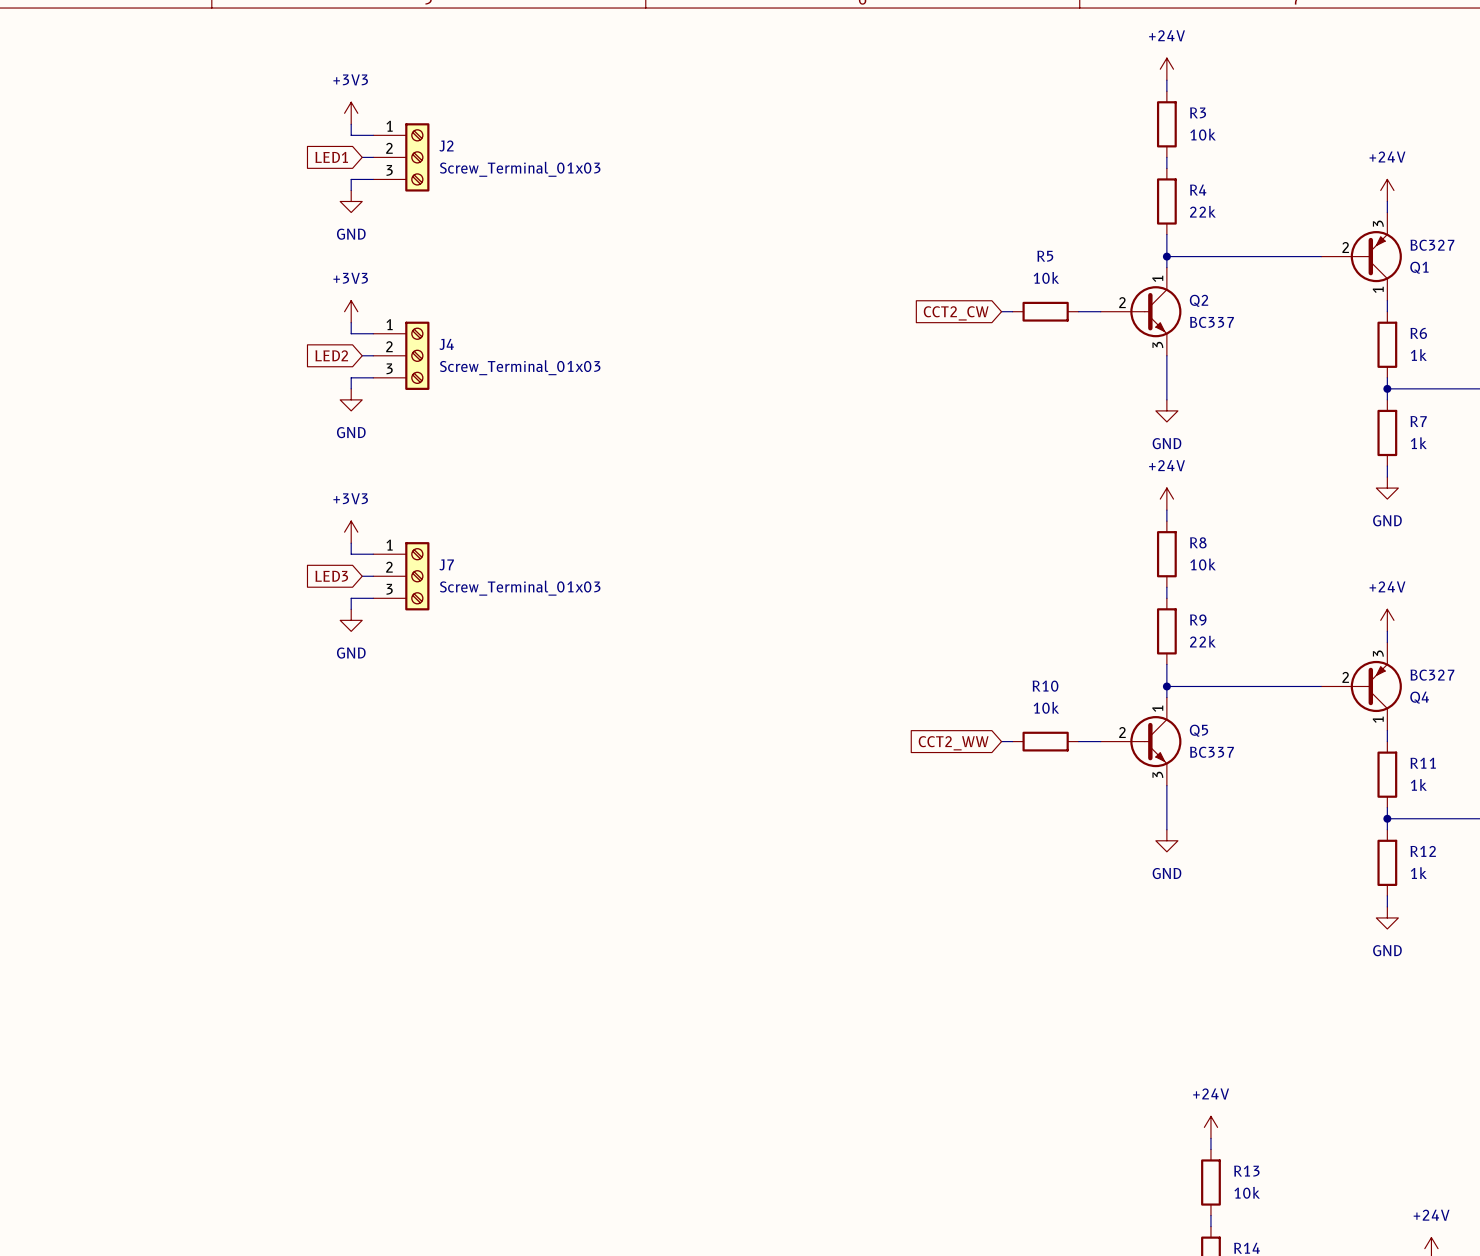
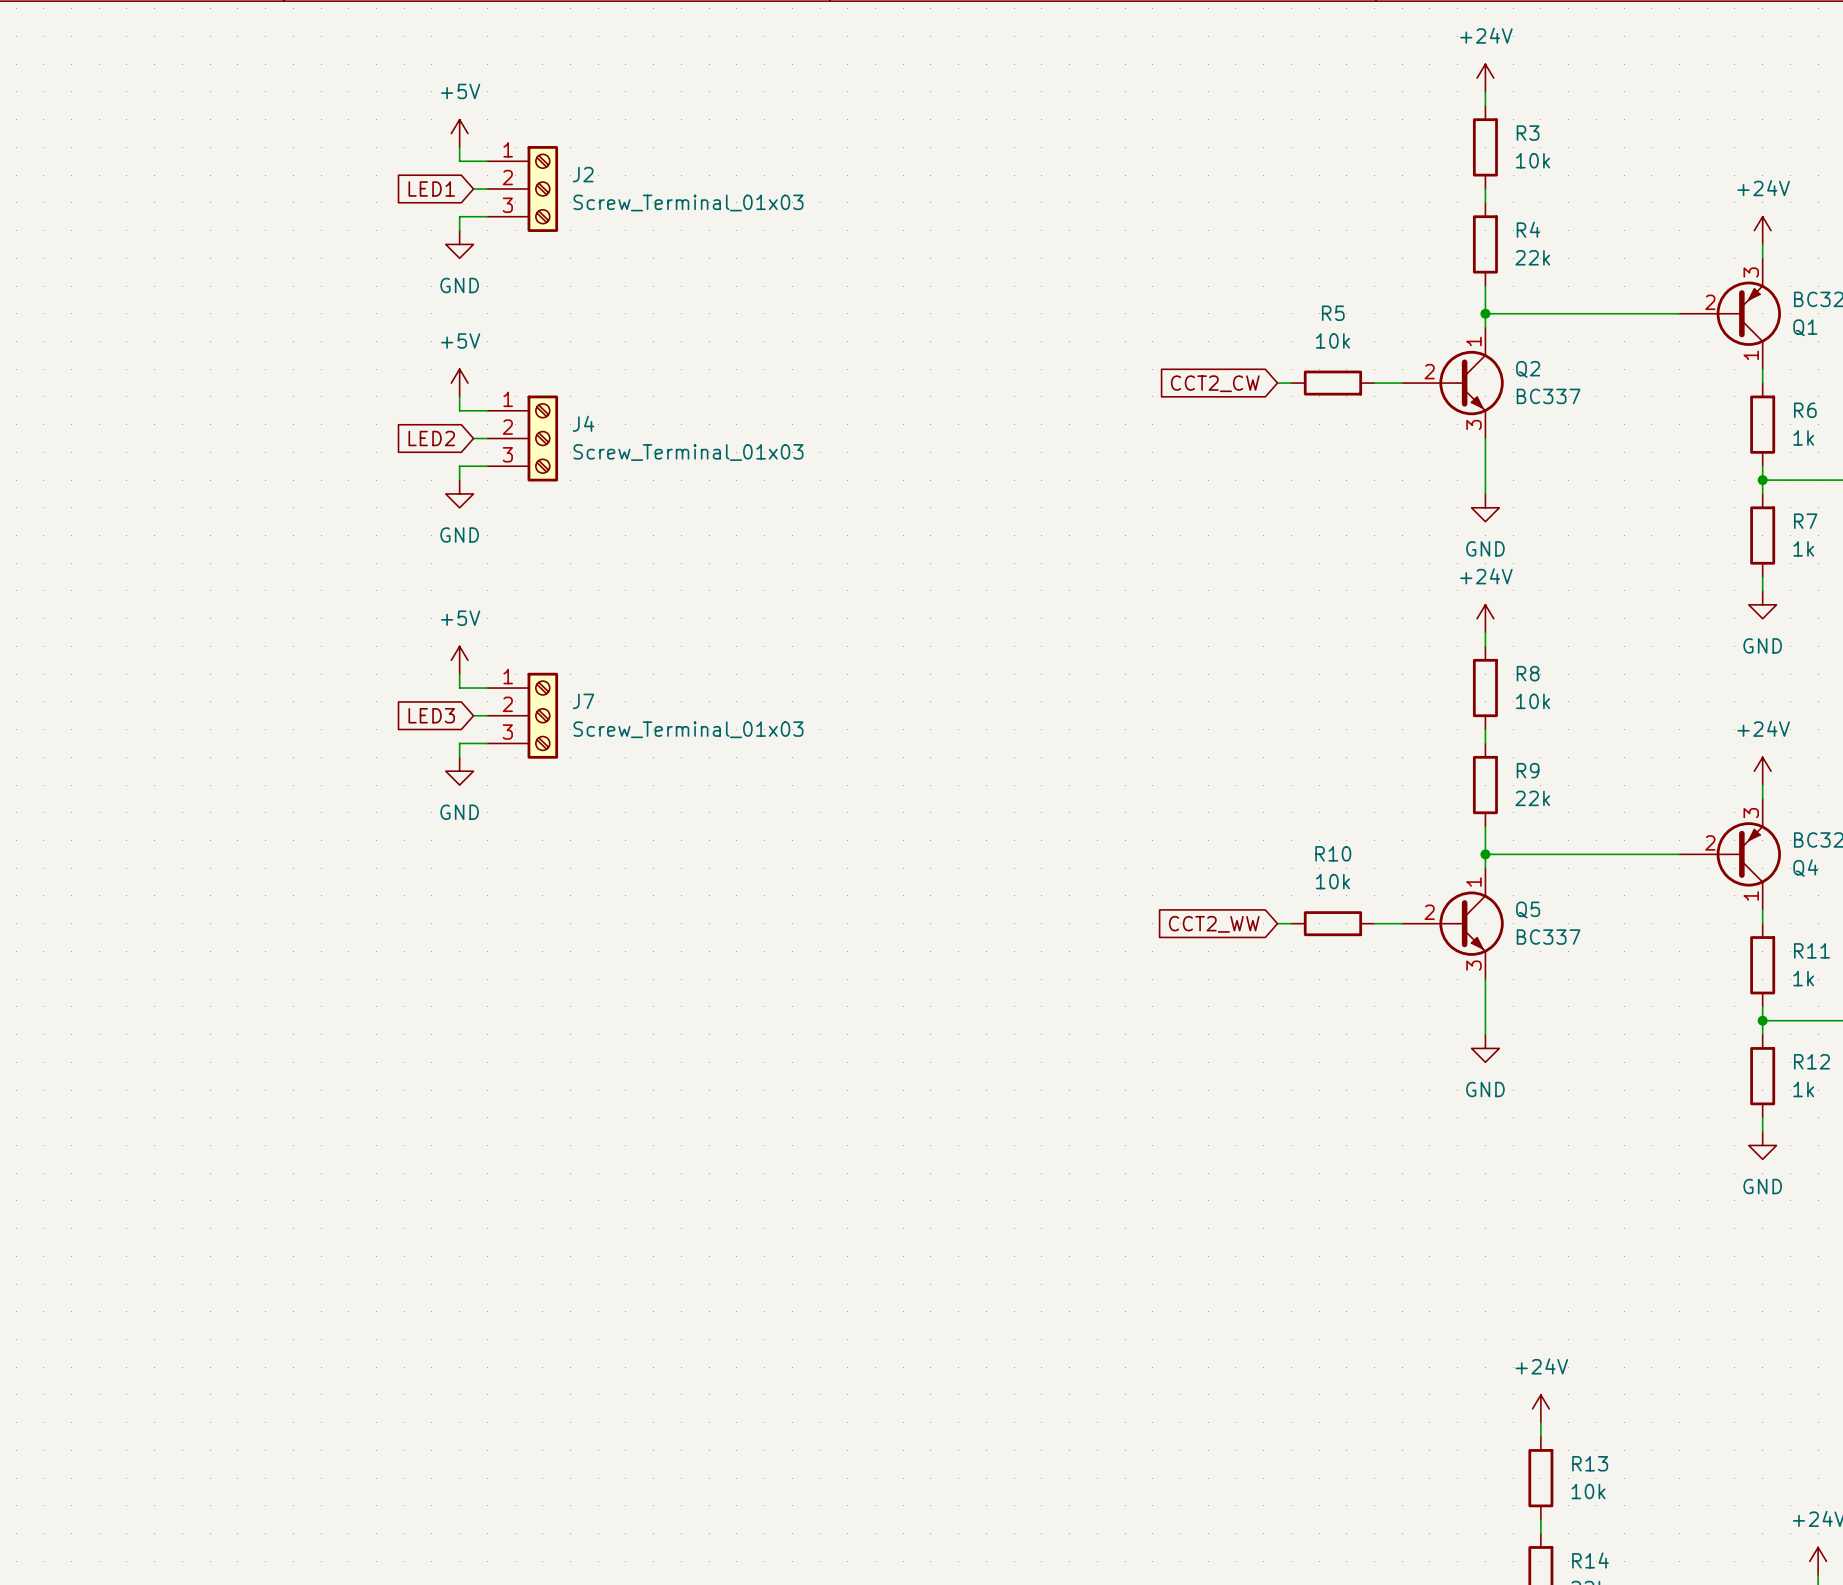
power symbol: +3V3 (351, 113) -> +5V (459, 133)
power symbol: +3V3 (351, 311) -> +5V (459, 383)
power symbol: +3V3 (351, 532) -> +5V (459, 660)

